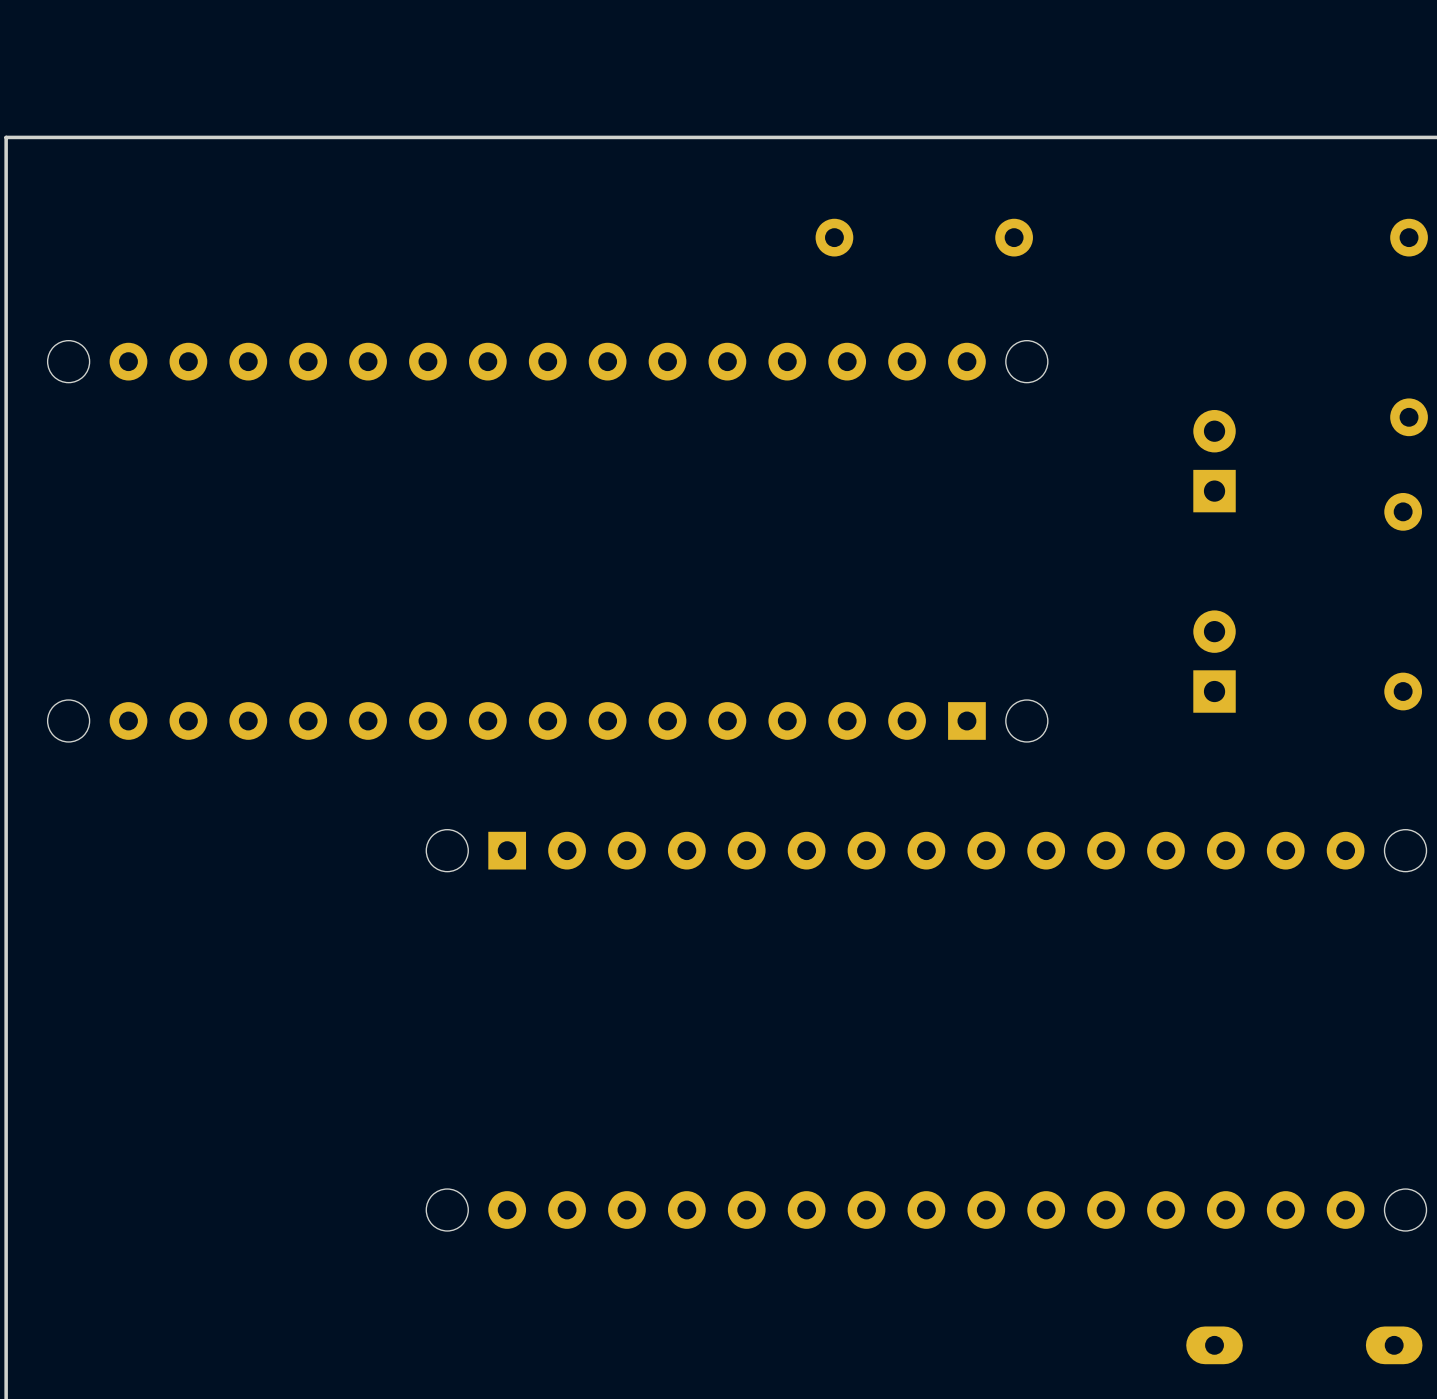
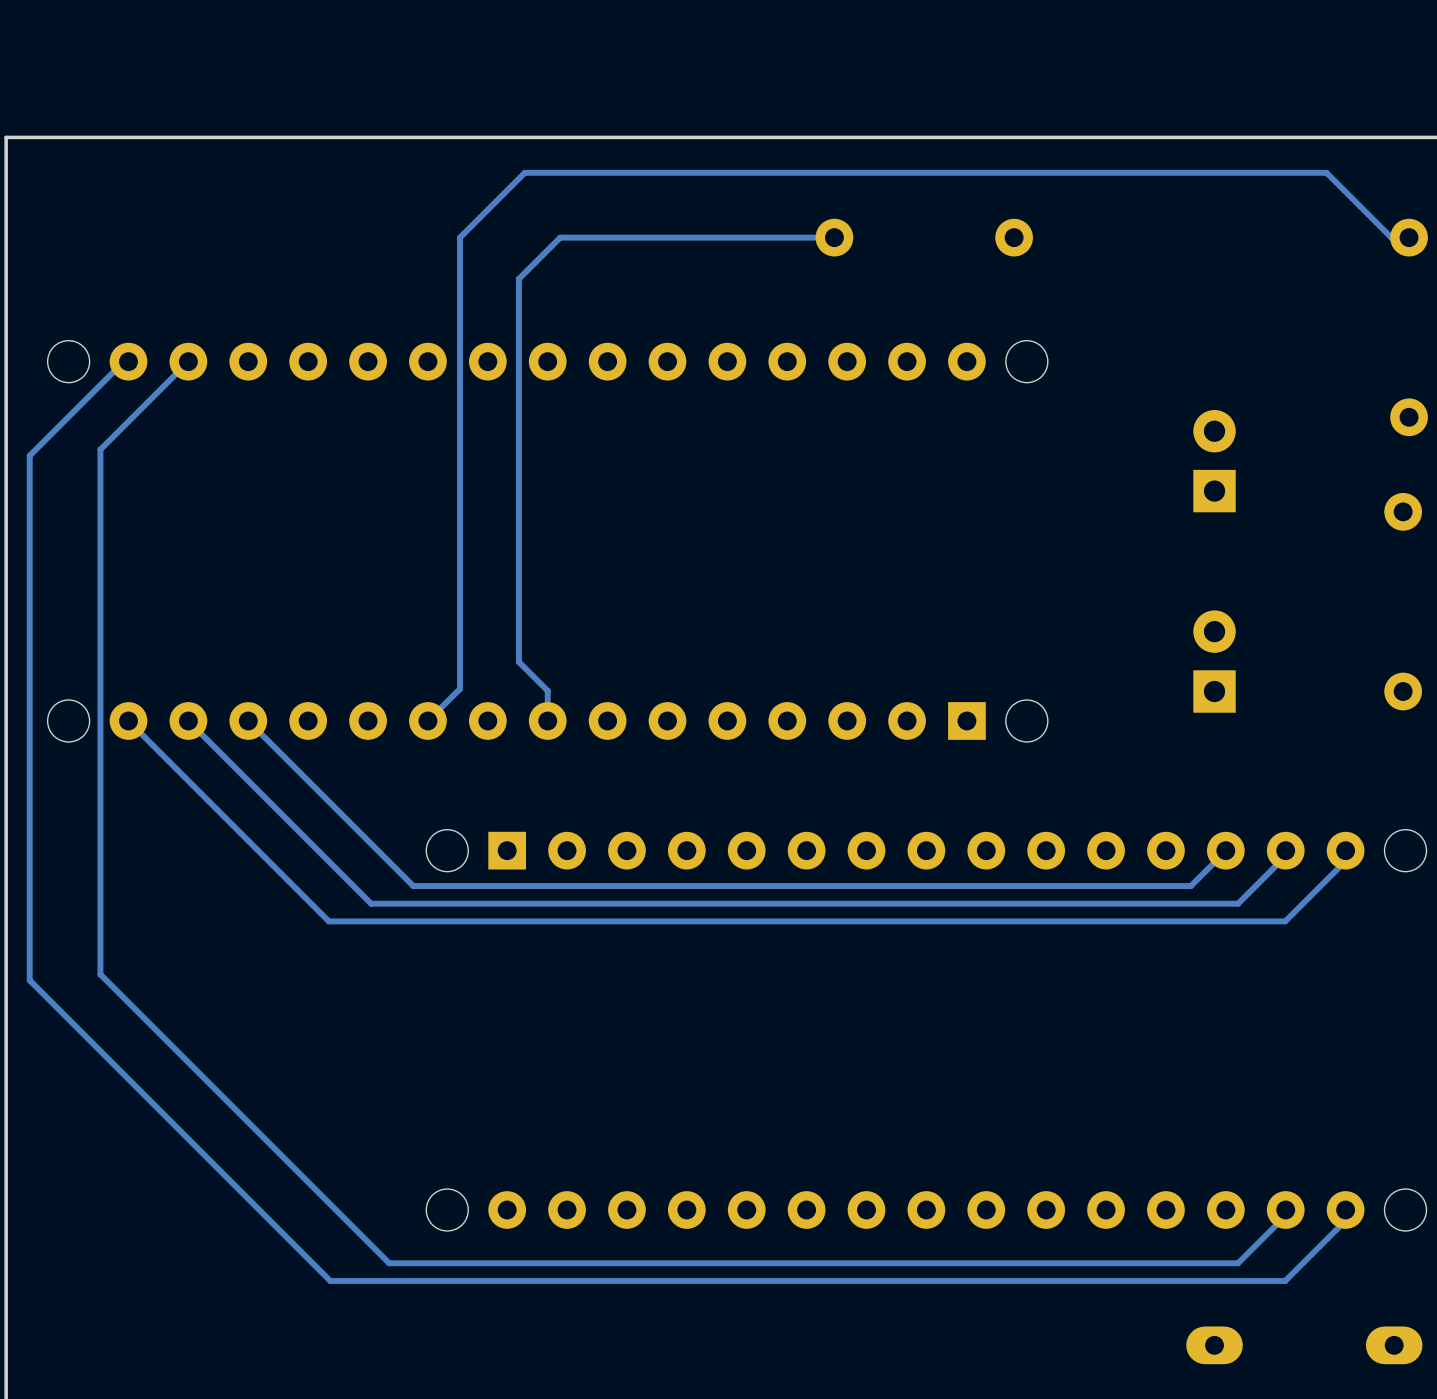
track: none -> (834, 237) (560, 237) (518, 278) (518, 662) (547, 690) (547, 720)
track: none -> (1409, 237) (1391, 237) (1326, 172) (524, 172) (460, 237) (460, 688) (427, 720)
track: none -> (128, 361) (123, 361) (29, 455) (29, 980) (330, 1280) (1285, 1280) (1345, 1220) (1345, 1210)
track: none -> (188, 361) (100, 449) (100, 974) (389, 1263) (1238, 1263) (1285, 1215) (1285, 1210)
track: none -> (128, 720) (328, 921) (1285, 921) (1345, 861) (1345, 850)
track: none -> (188, 720) (371, 903) (1238, 903) (1285, 856) (1285, 850)
track: none -> (248, 720) (413, 886) (1190, 886) (1225, 851)

